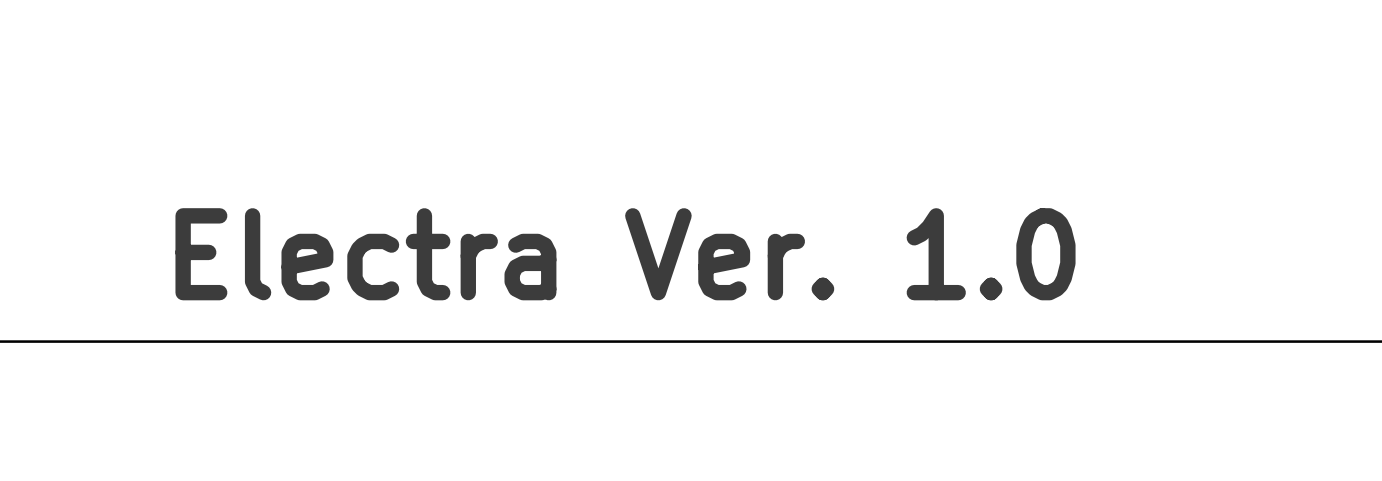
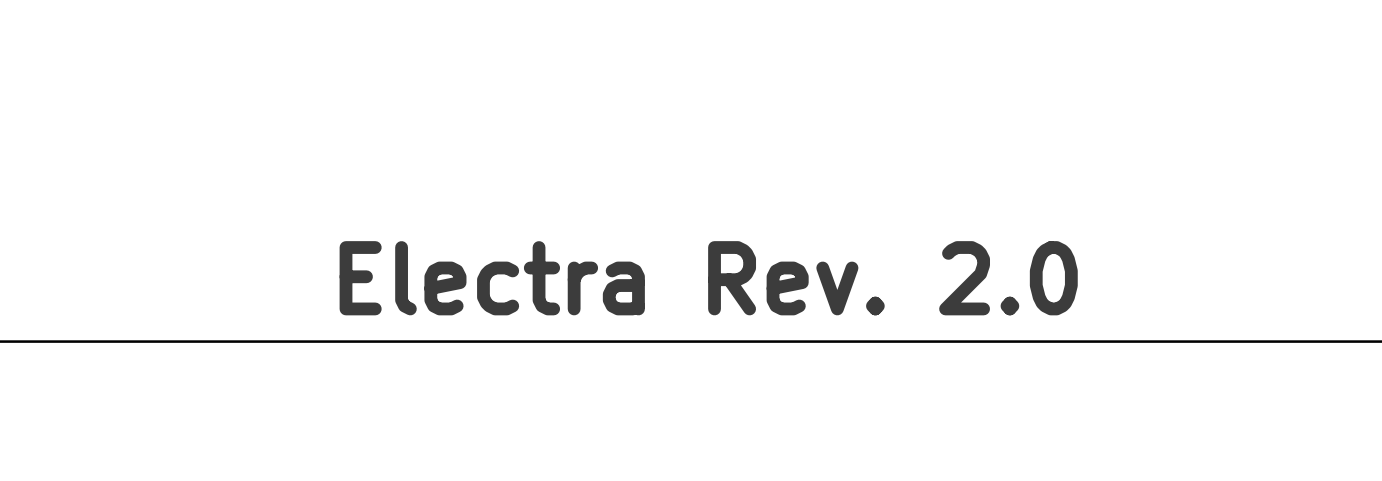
text: Electra Ver. 1.0 (625, 254) -> Electra Rev. 2.0 (708, 278)

